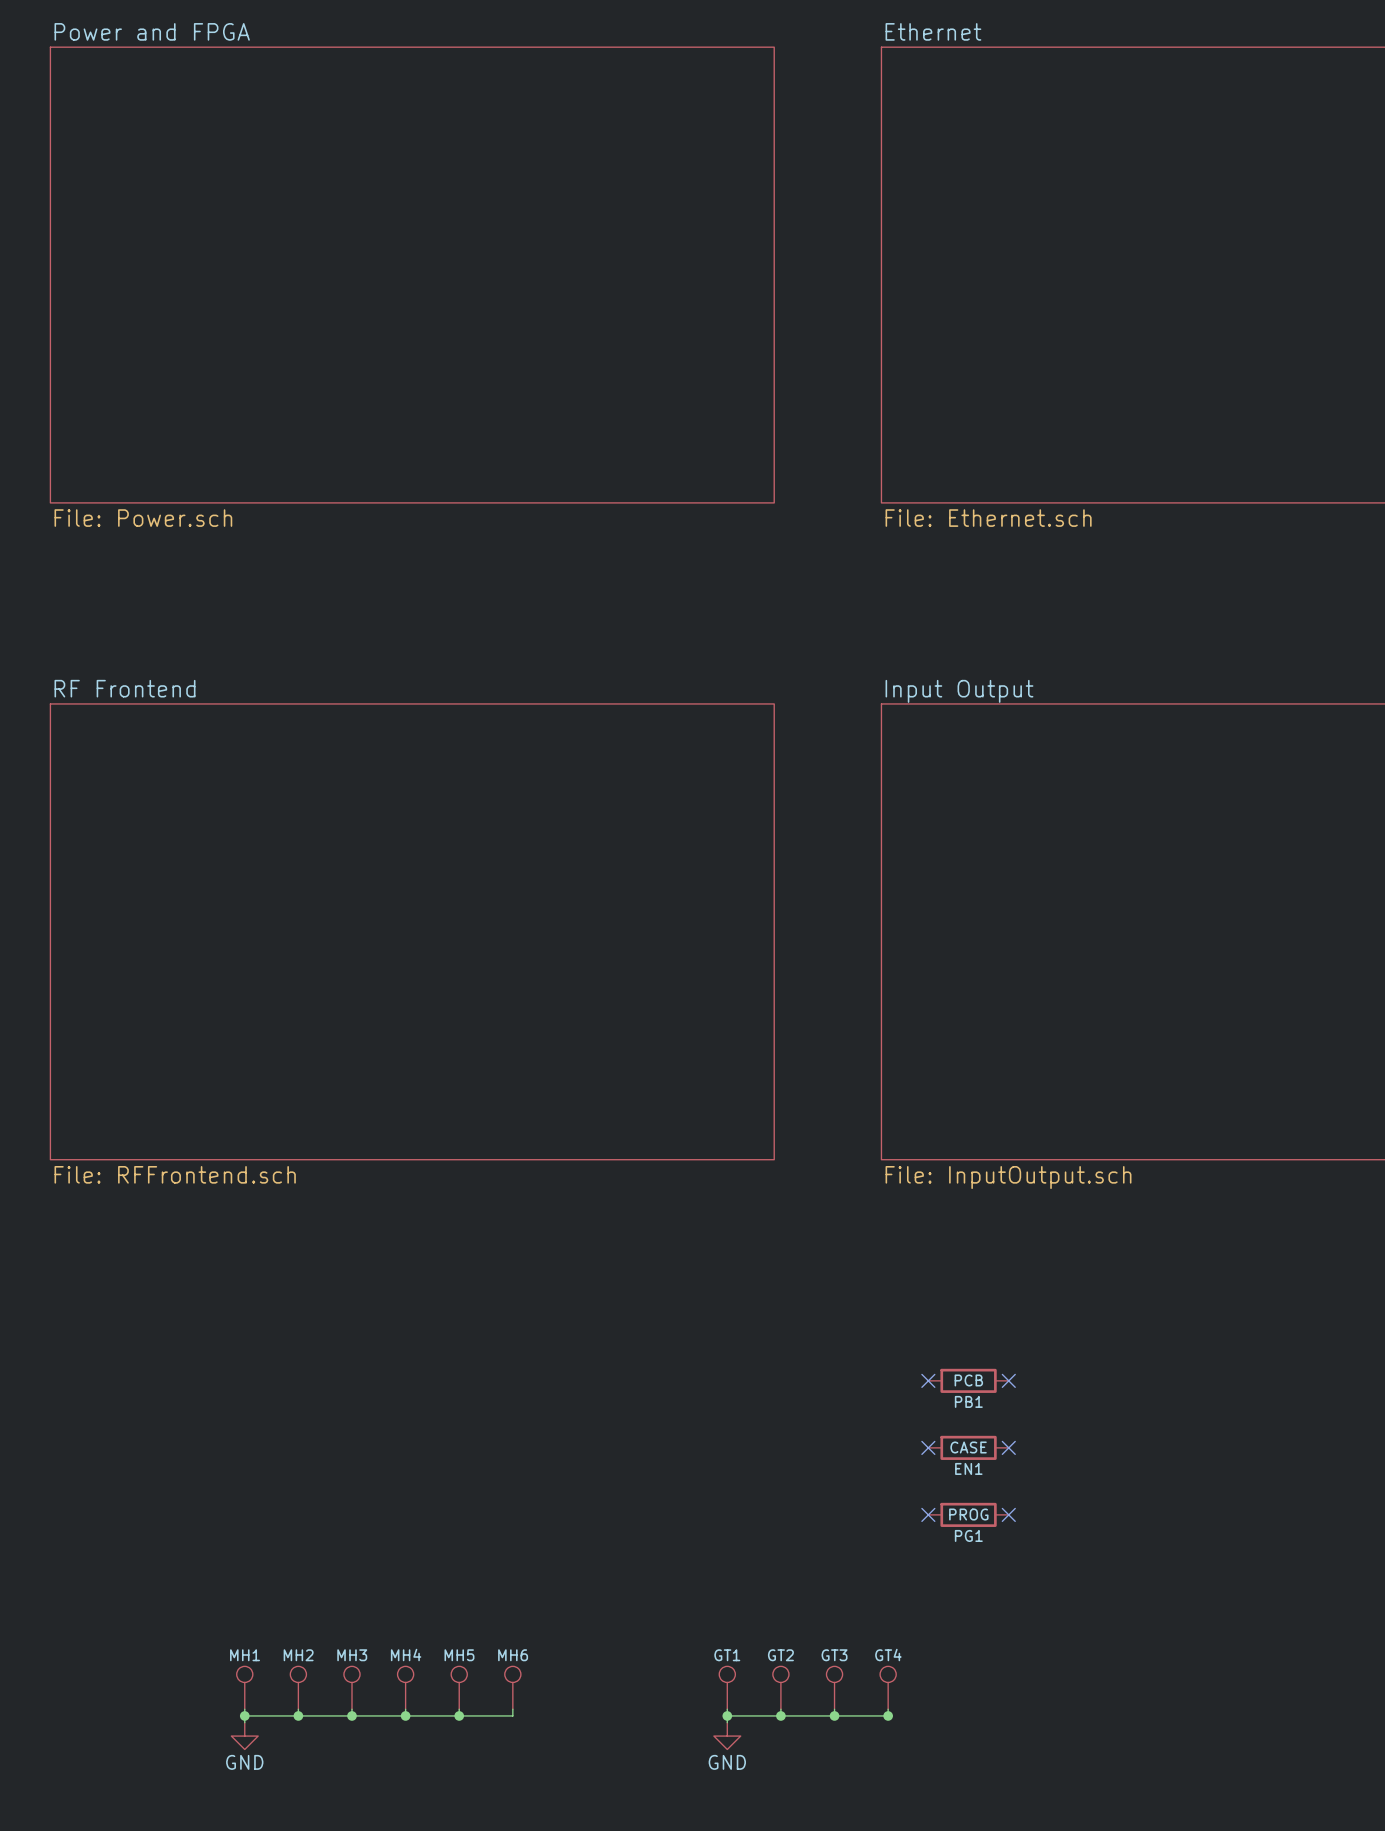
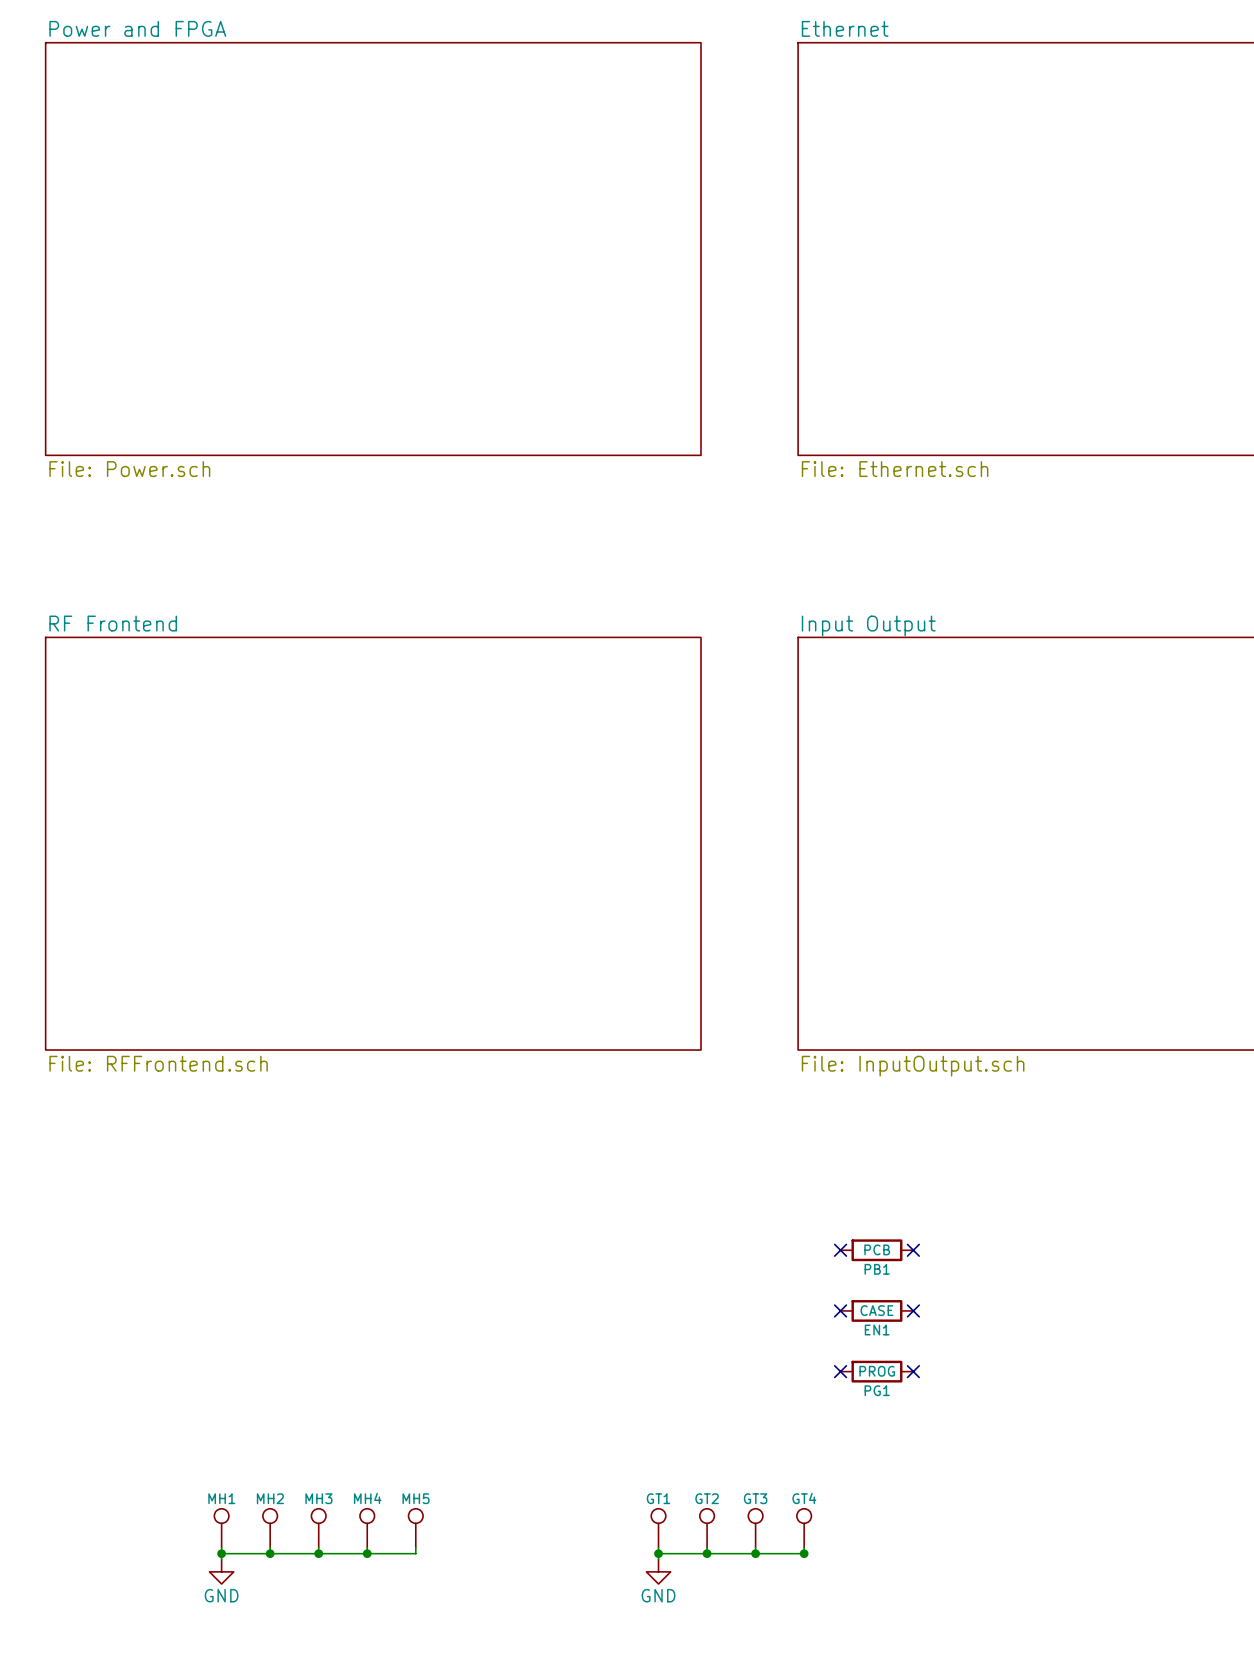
MH6: (512, 1687) -> none
wire: (512, 1709) (512, 1715) (459, 1715) -> none
junction: (459, 1715) -> none

